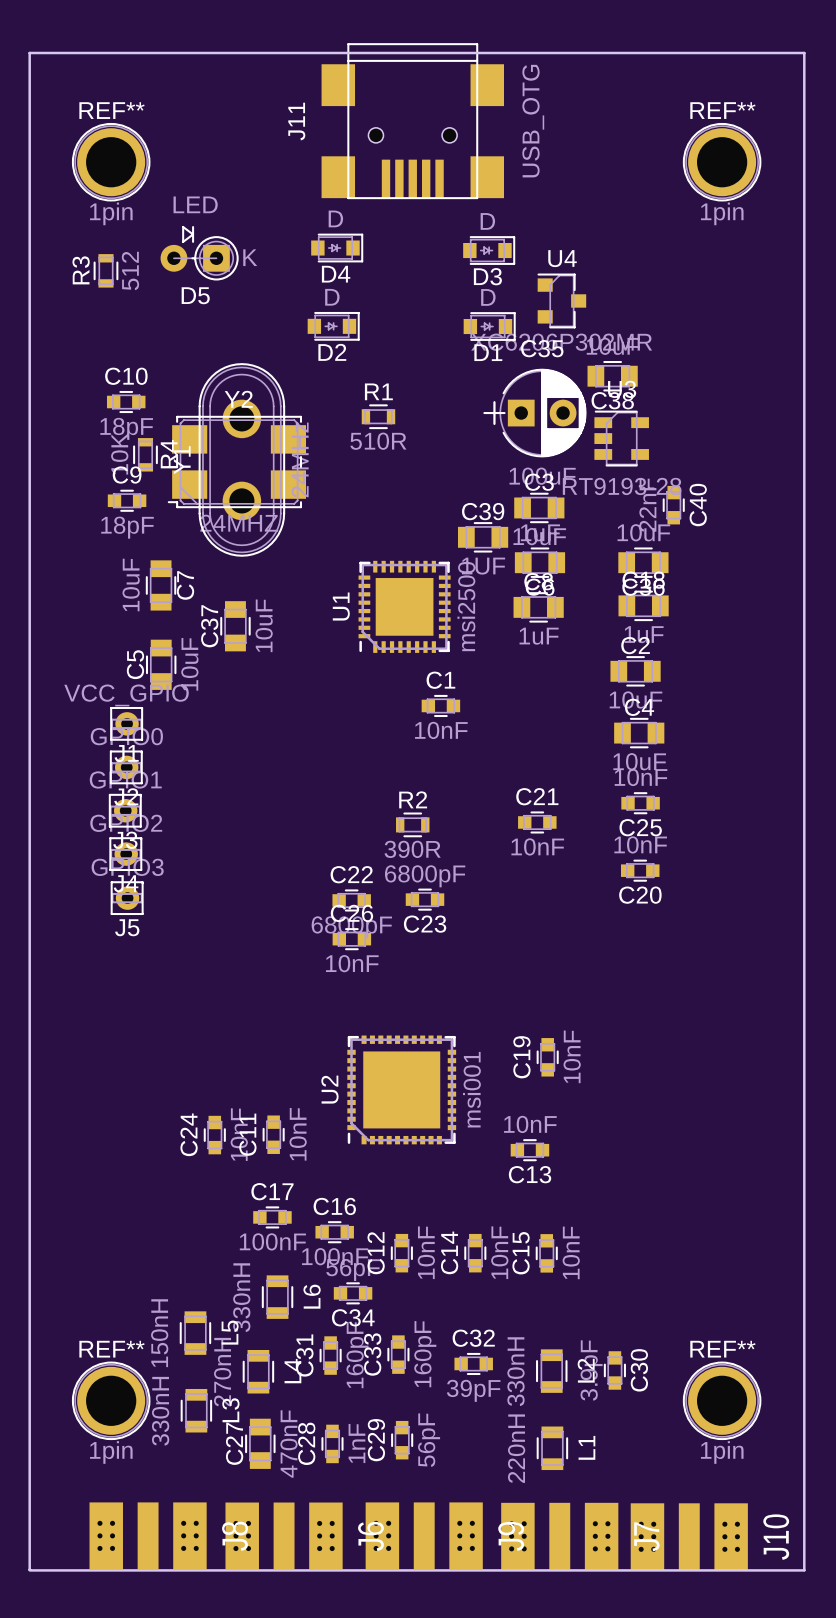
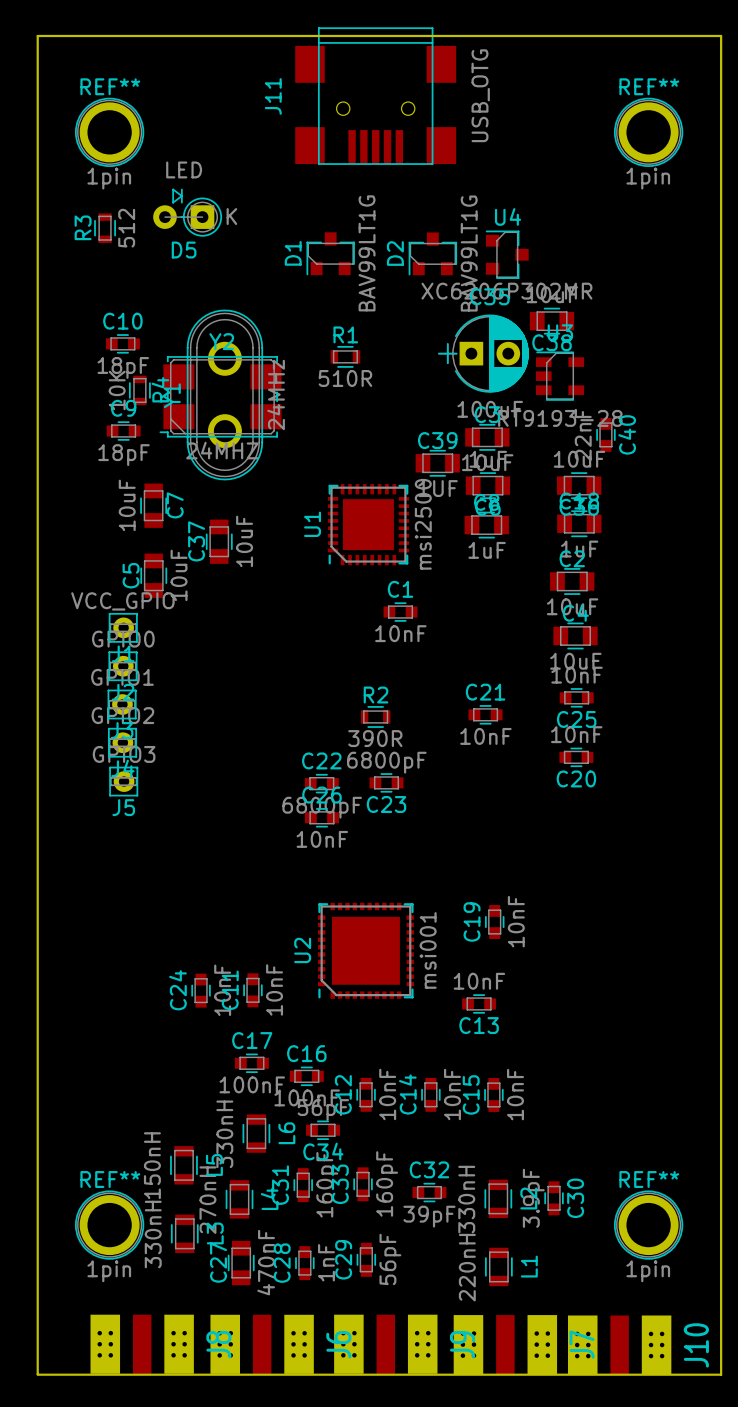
D4: D (337, 248) -> none
D3: D (489, 250) -> none
D2 value: D (332, 297) -> BAV99LT1G (469, 253)
D1 value: D (488, 297) -> BAV99LT1G (367, 253)
D2 footprint: [307, 311, 360, 341] -> [408, 232, 458, 276]
D1 footprint: [463, 312, 516, 341] -> [306, 232, 355, 276]
D2 name position: D2 (332, 352) -> D2 (395, 253)
D1 name position: D1 (488, 352) -> D1 (293, 253)

